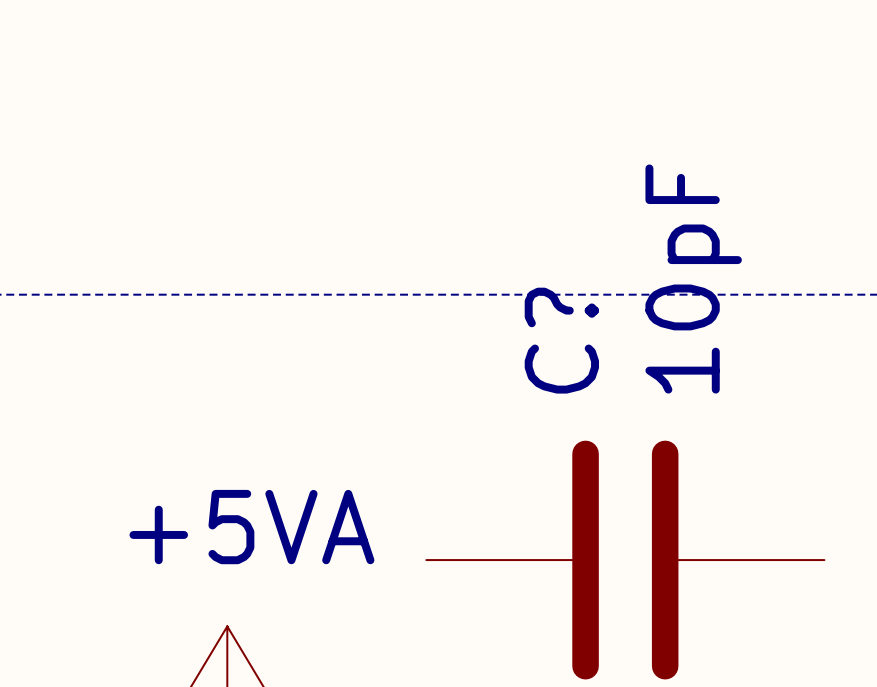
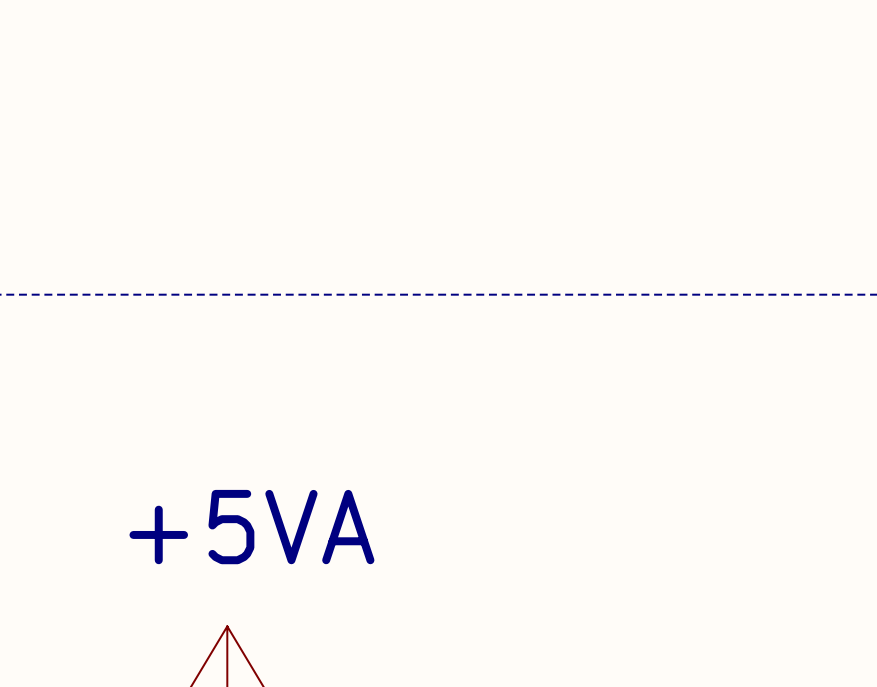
C?: 10pF (625, 560) -> none

